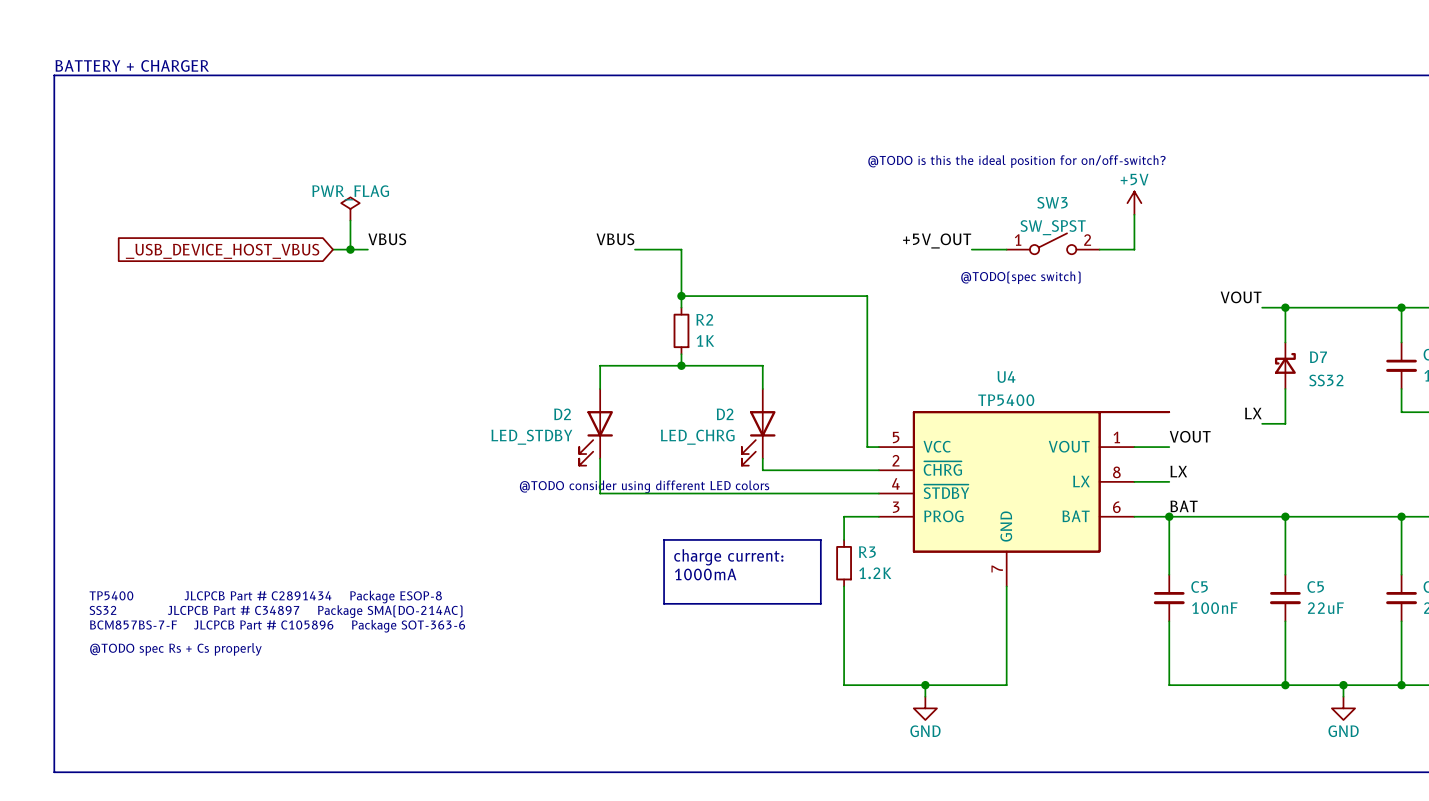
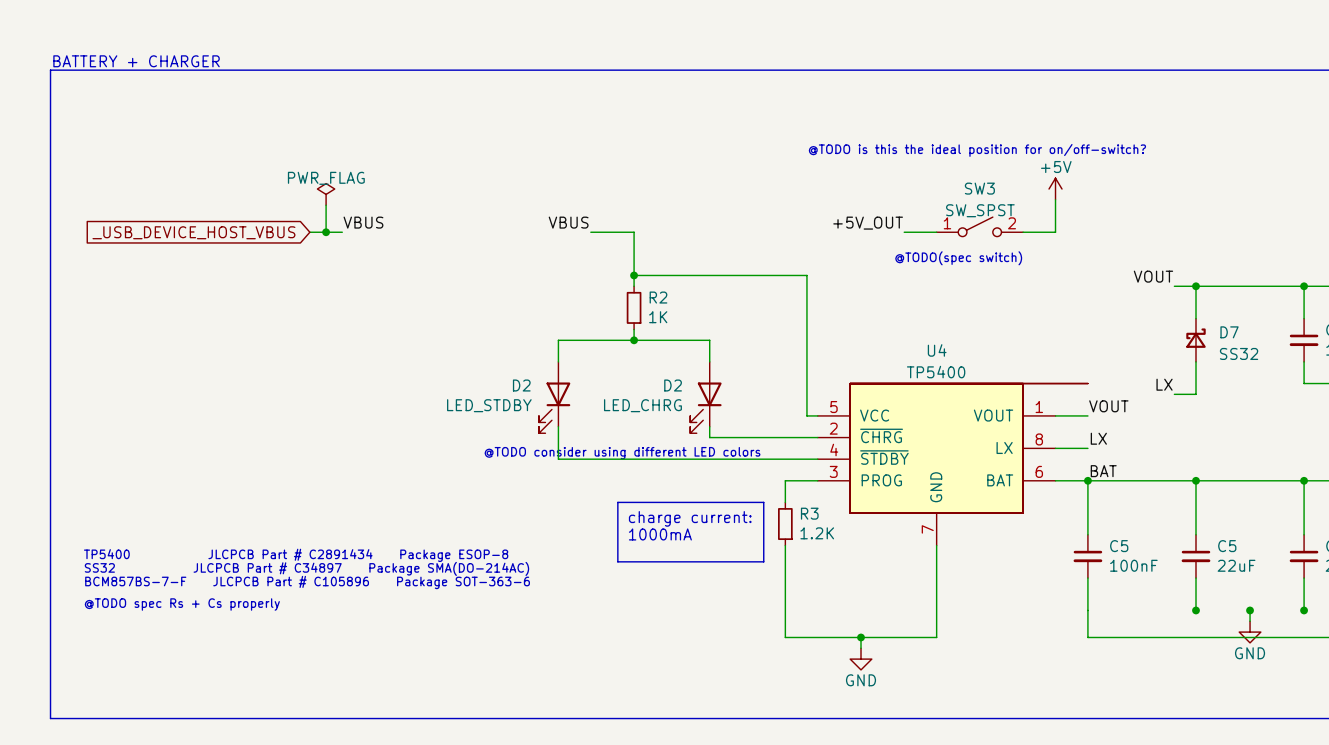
wire: (1285, 656) (1285, 685) -> none
wire: (1401, 656) (1401, 685) -> none
junction position: (1285, 685) -> (1196, 610)
wire: (1343, 685) (1343, 696) -> (1250, 610) (1250, 621)
junction position: (1343, 685) -> (1250, 610)
junction position: (1401, 685) -> (1304, 610)
power symbol position: GND (1343, 708) -> GND (1250, 632)

